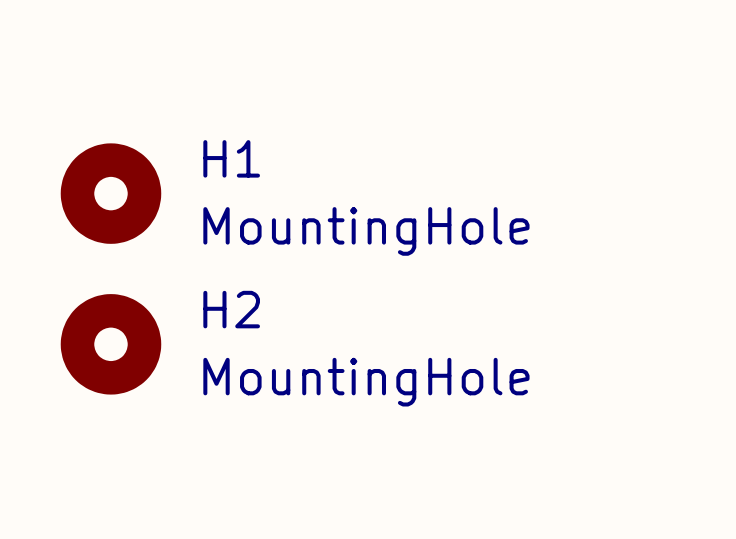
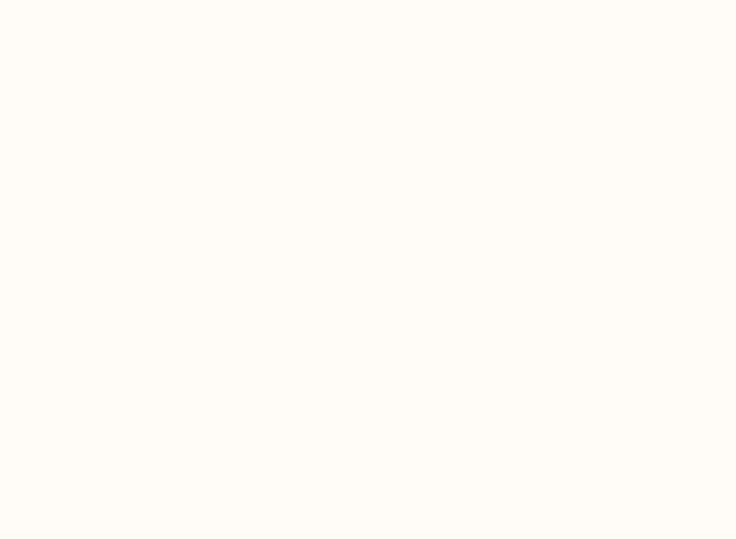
H1: MountingHole (110, 193) -> none
H2: MountingHole (110, 344) -> none

